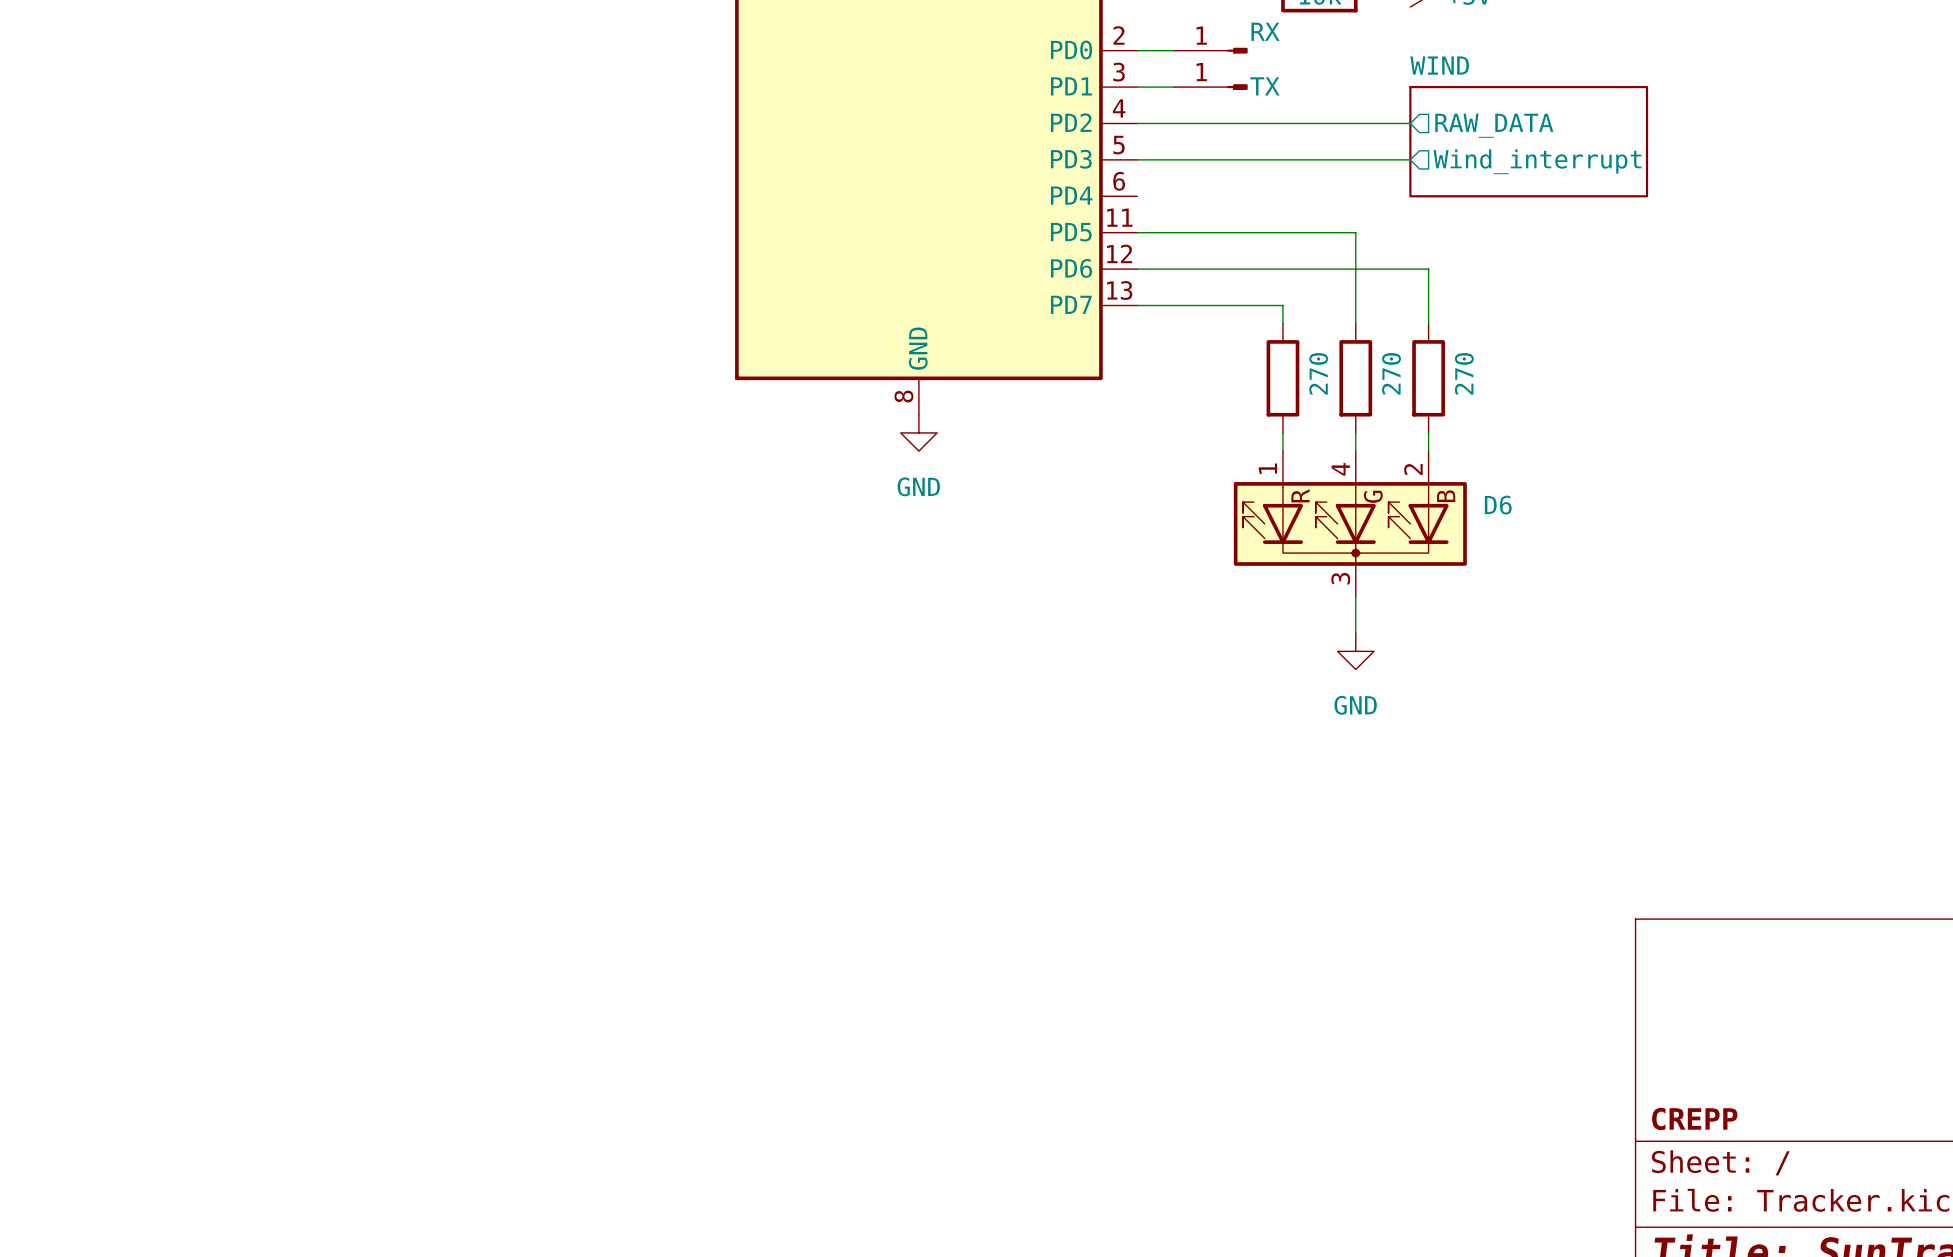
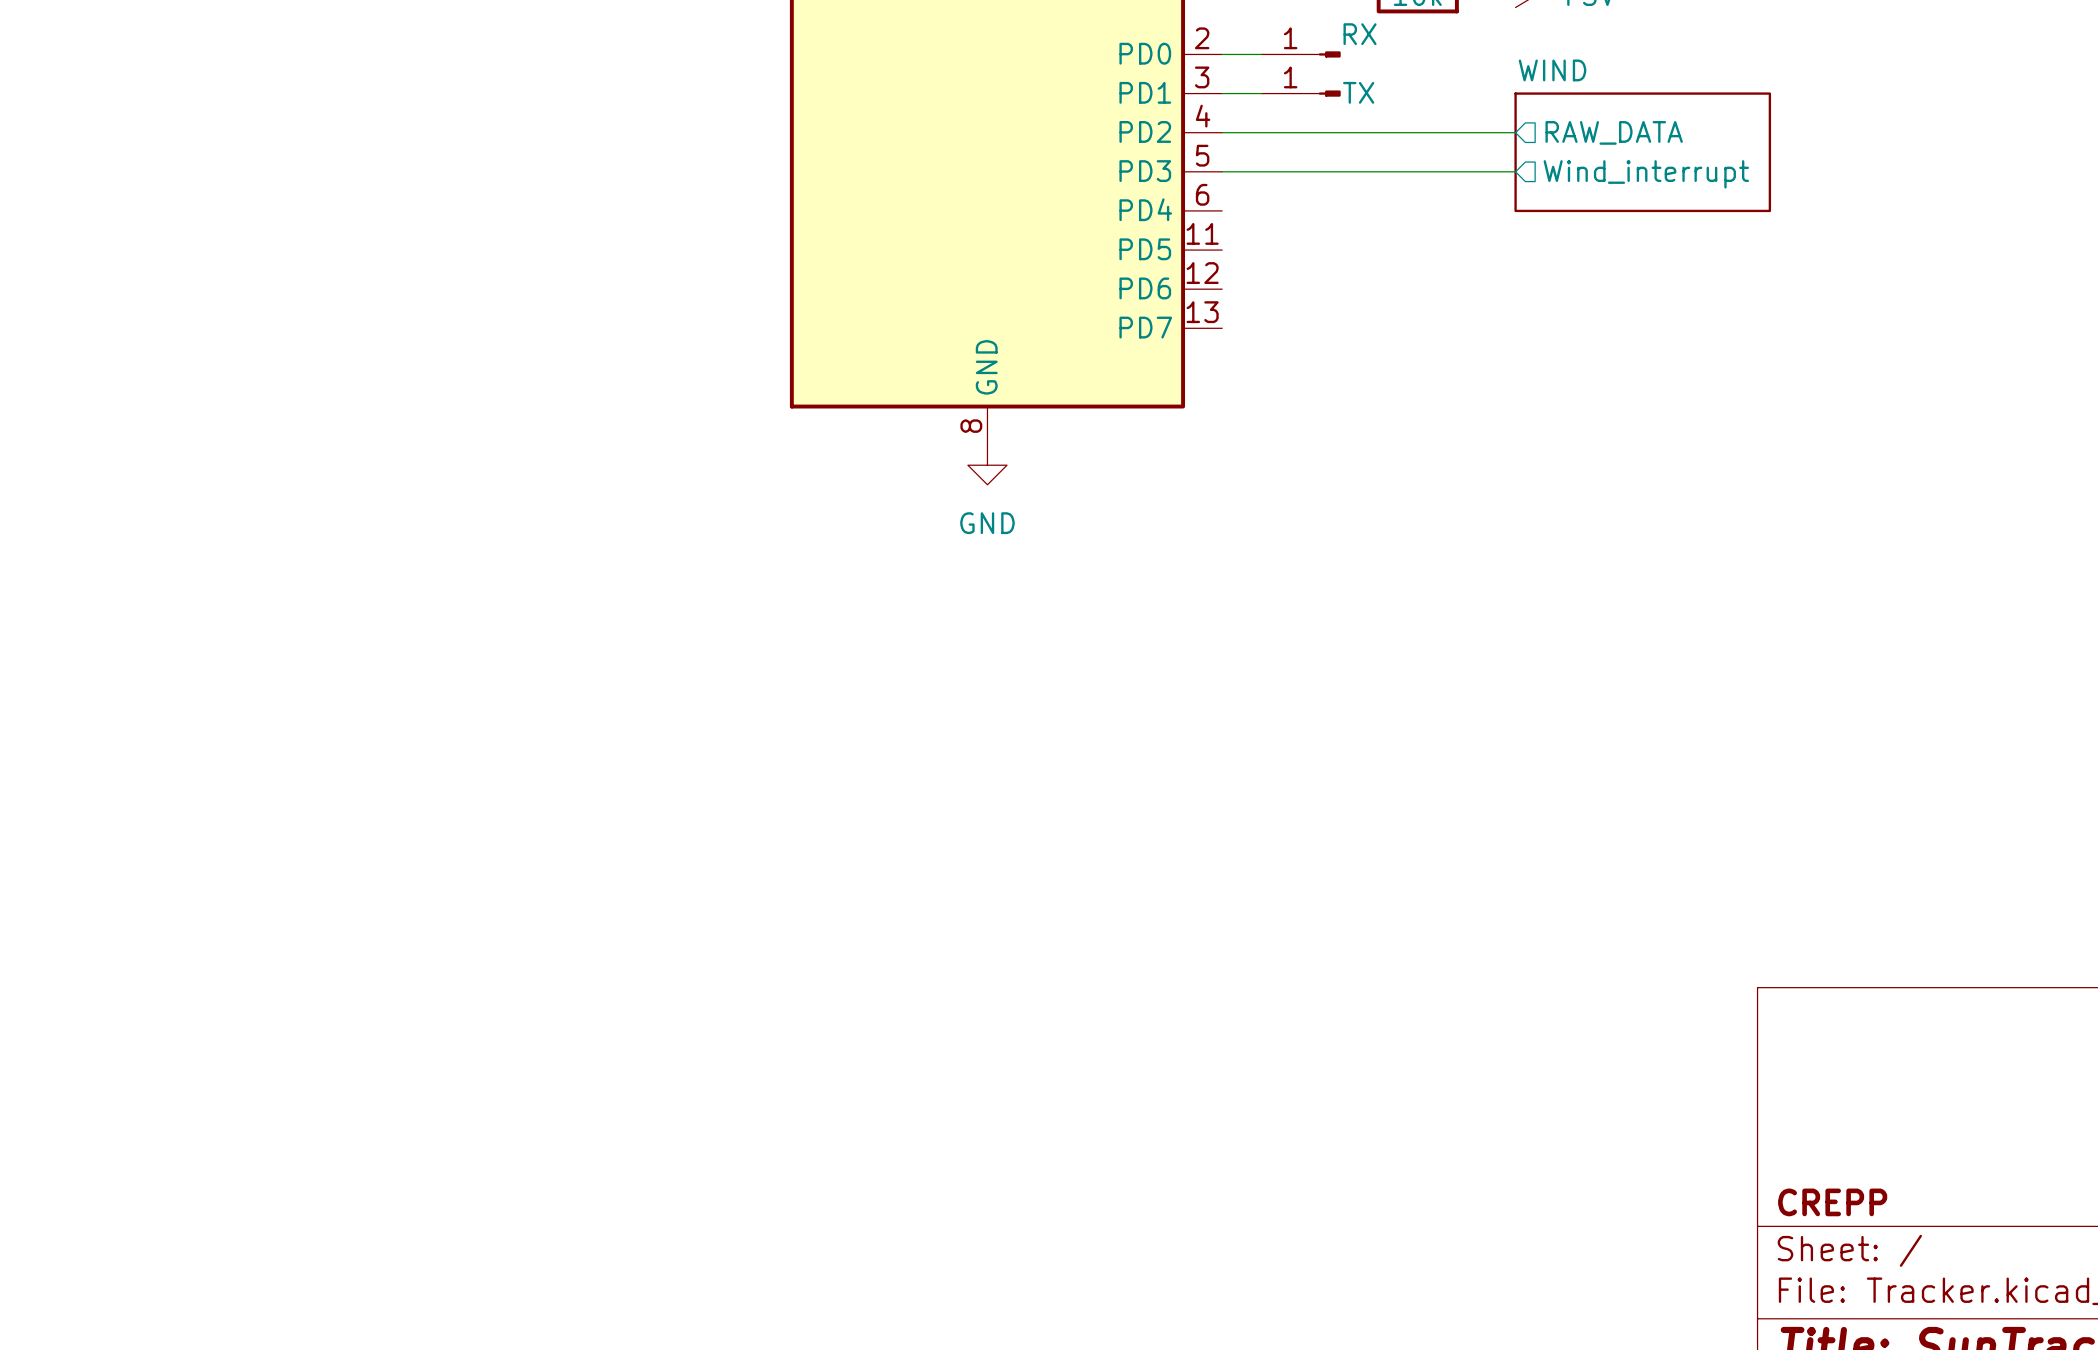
wire: (1137, 232) (1355, 232) (1355, 323) -> none
wire: (1137, 269) (1428, 269) (1428, 323) -> none
wire: (1137, 305) (1282, 305) (1282, 323) -> none
part: 270 (1282, 378) -> none
part: 270 (1355, 378) -> none
part: 270 (1428, 378) -> none
wire: (1282, 432) (1282, 451) -> none
wire: (1355, 432) (1355, 451) -> none
wire: (1428, 432) (1428, 451) -> none
D6: (1350, 523) -> none
wire: (1355, 596) (1355, 633) -> none
power symbol: GND (1355, 651) -> none

